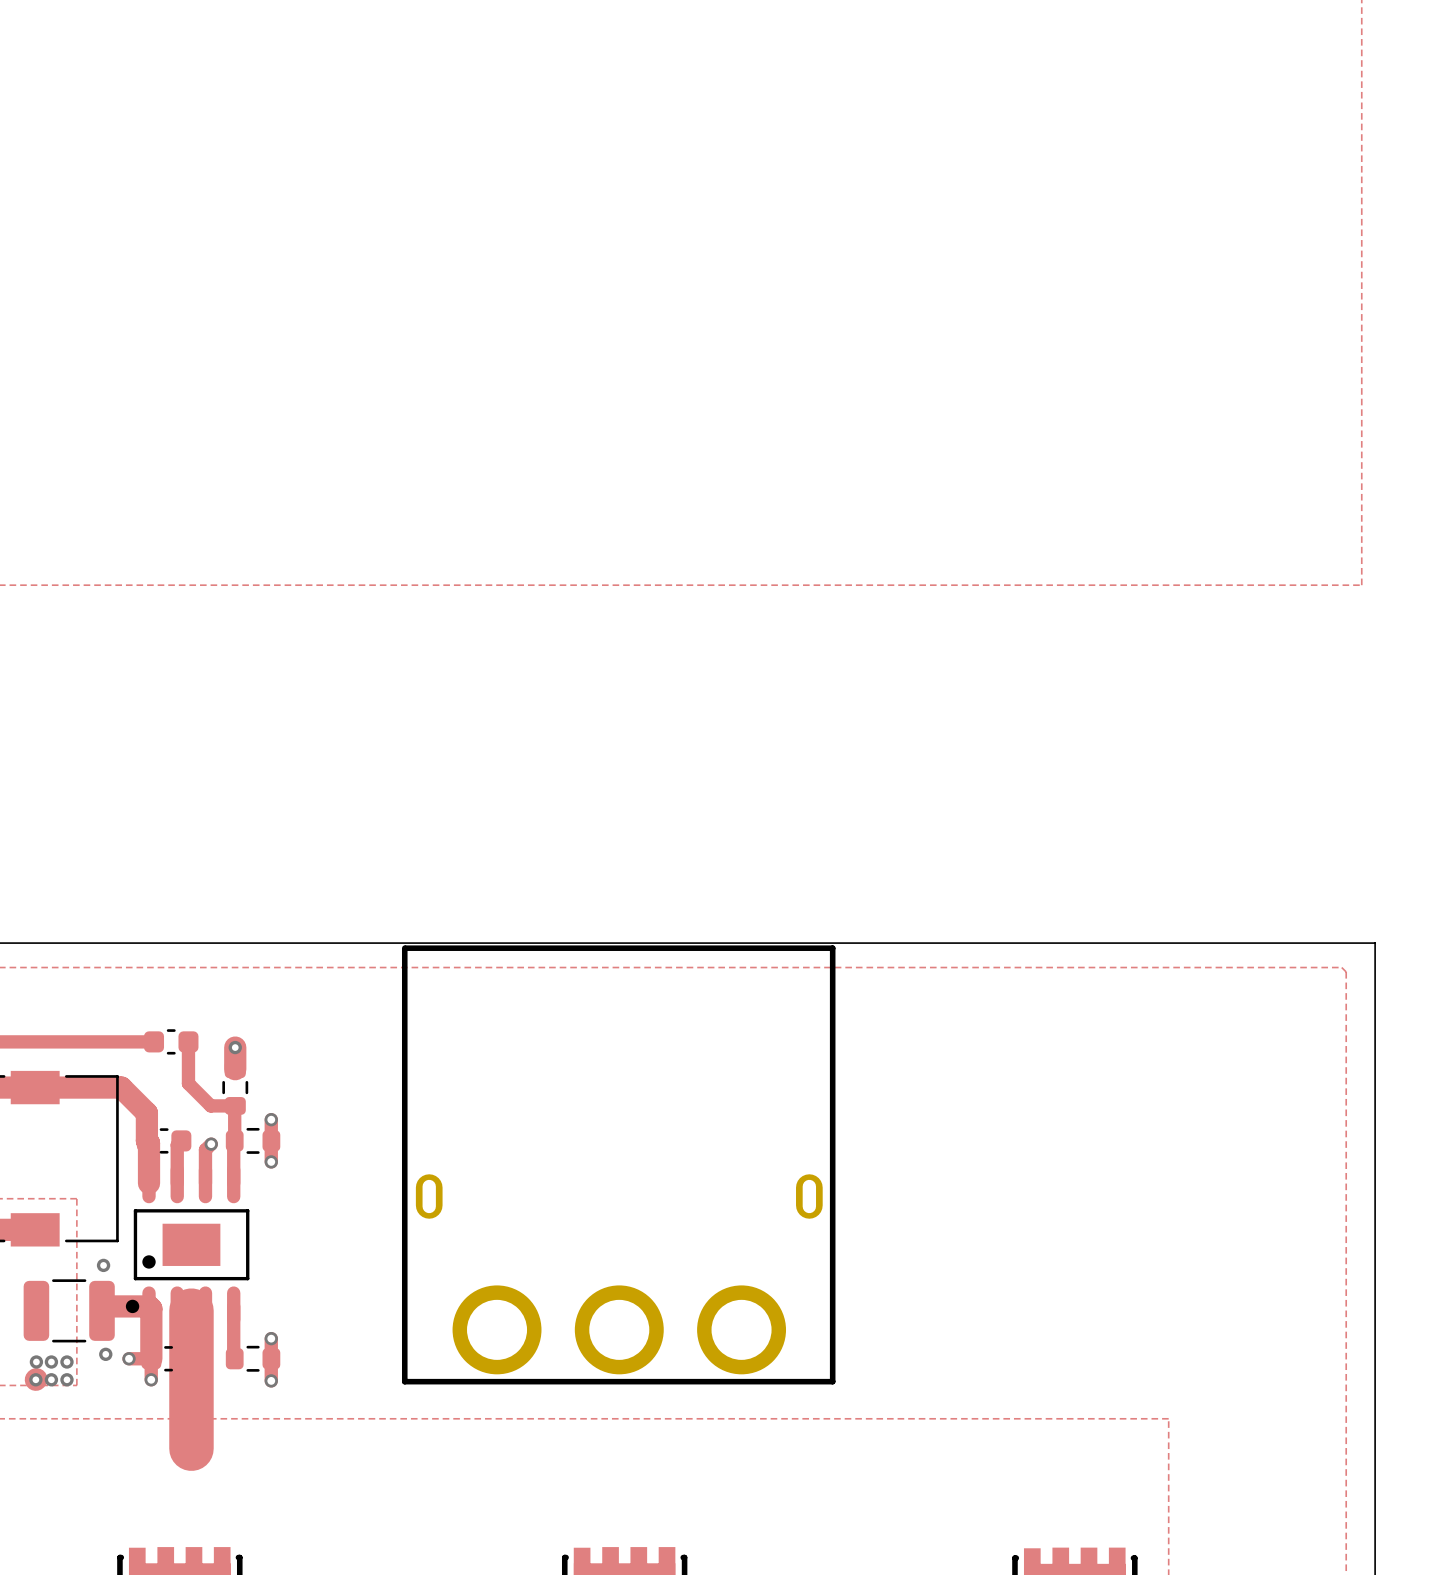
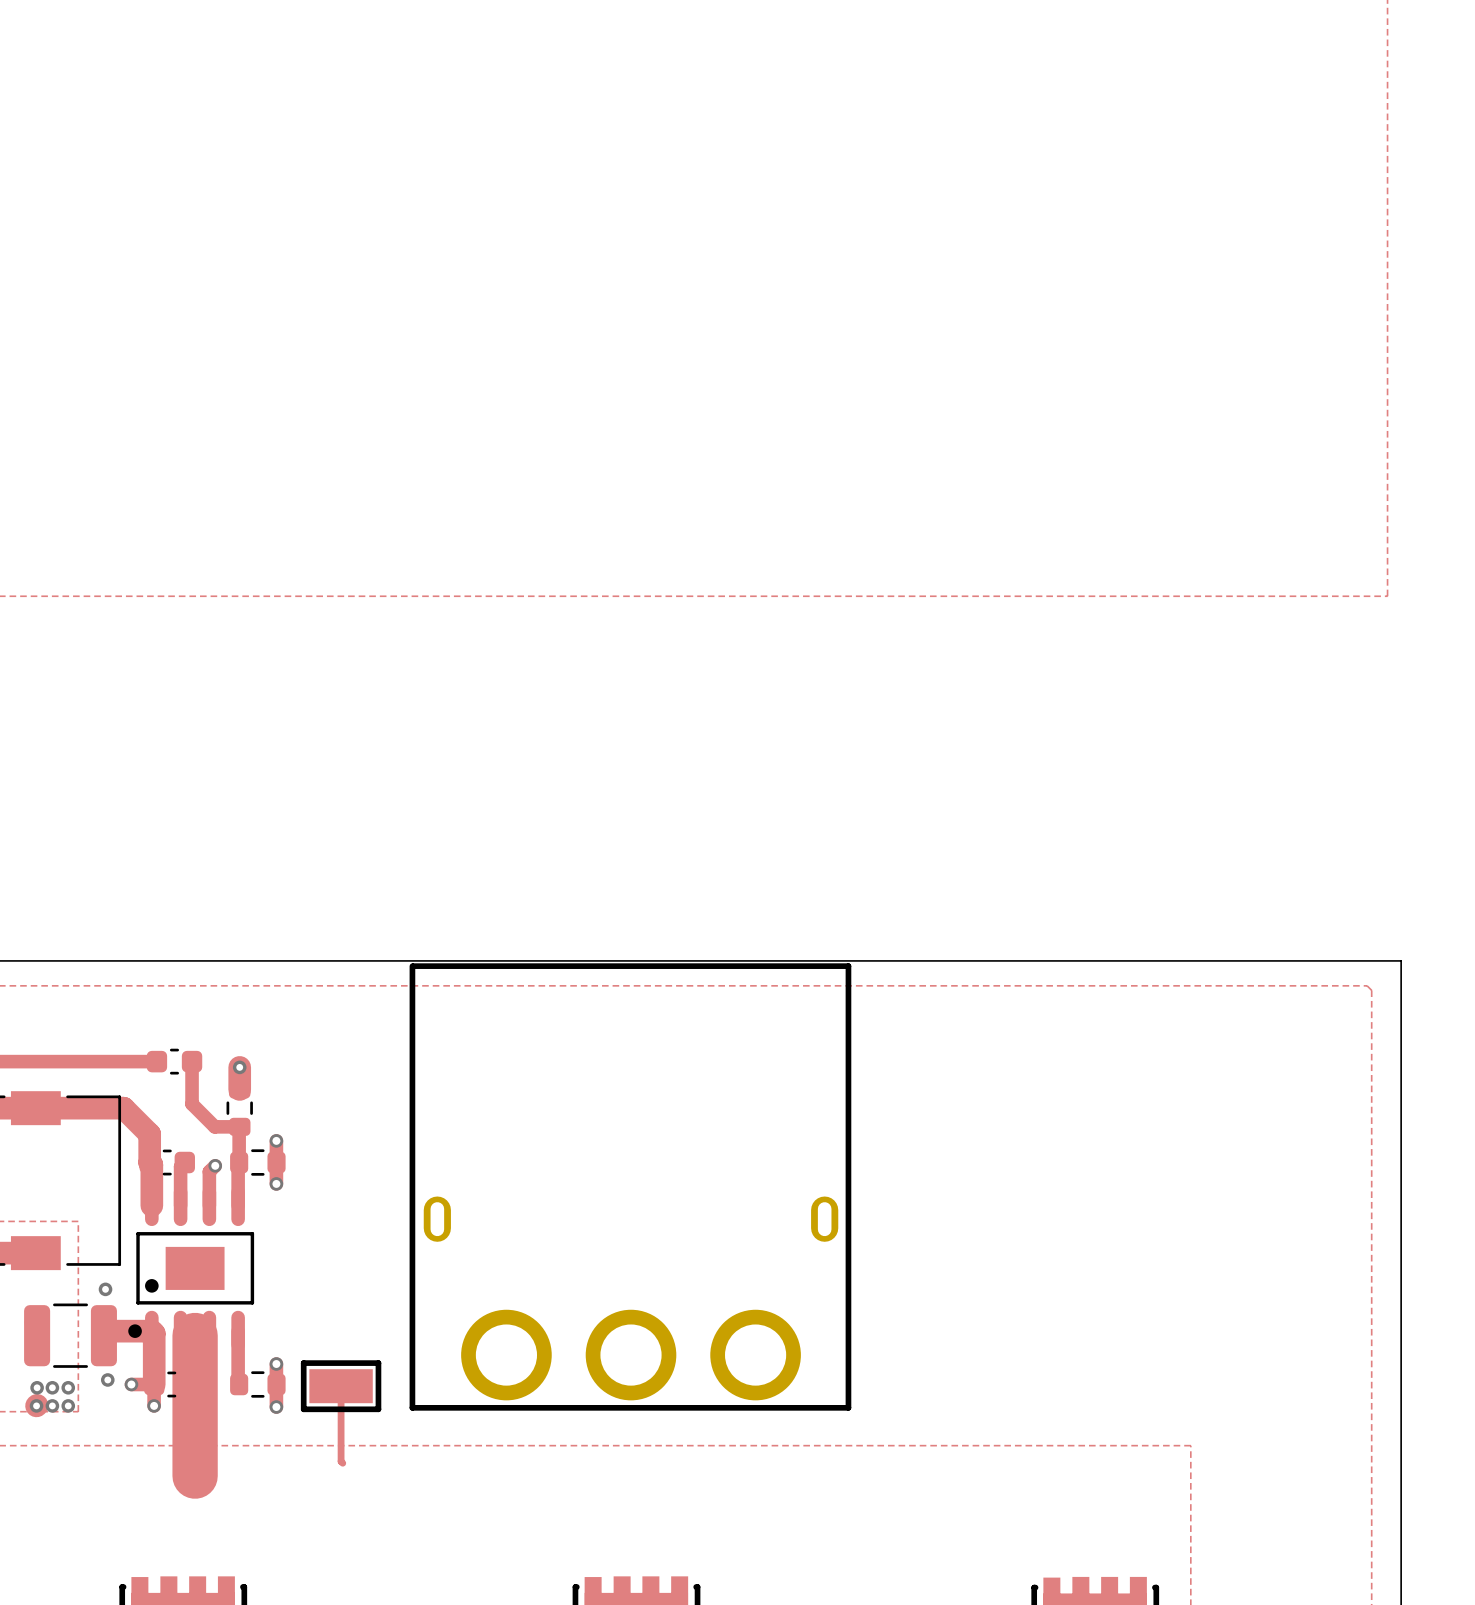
track: none -> (341, 1386) (341, 1461) (342, 1463)
part: none -> (341, 1386)

